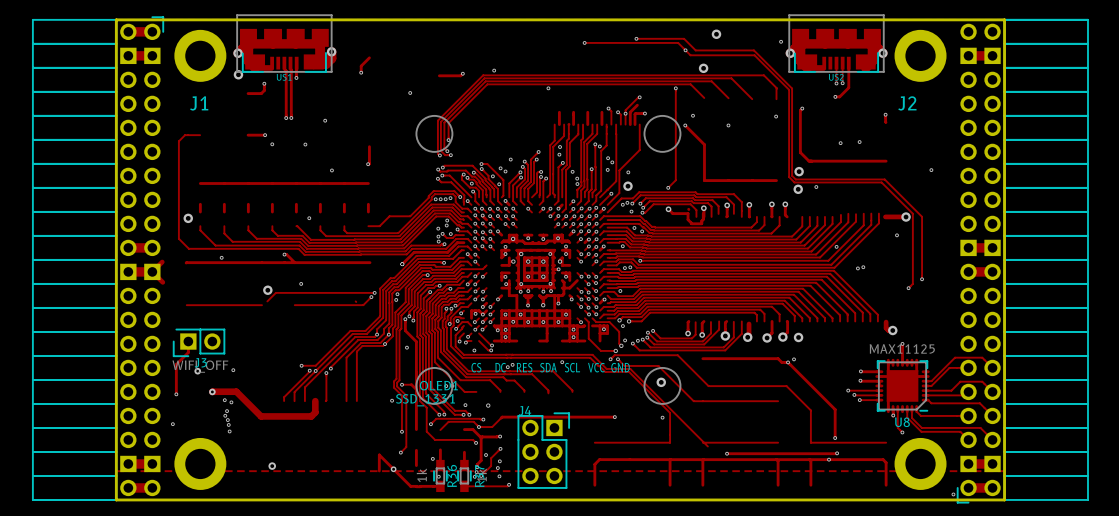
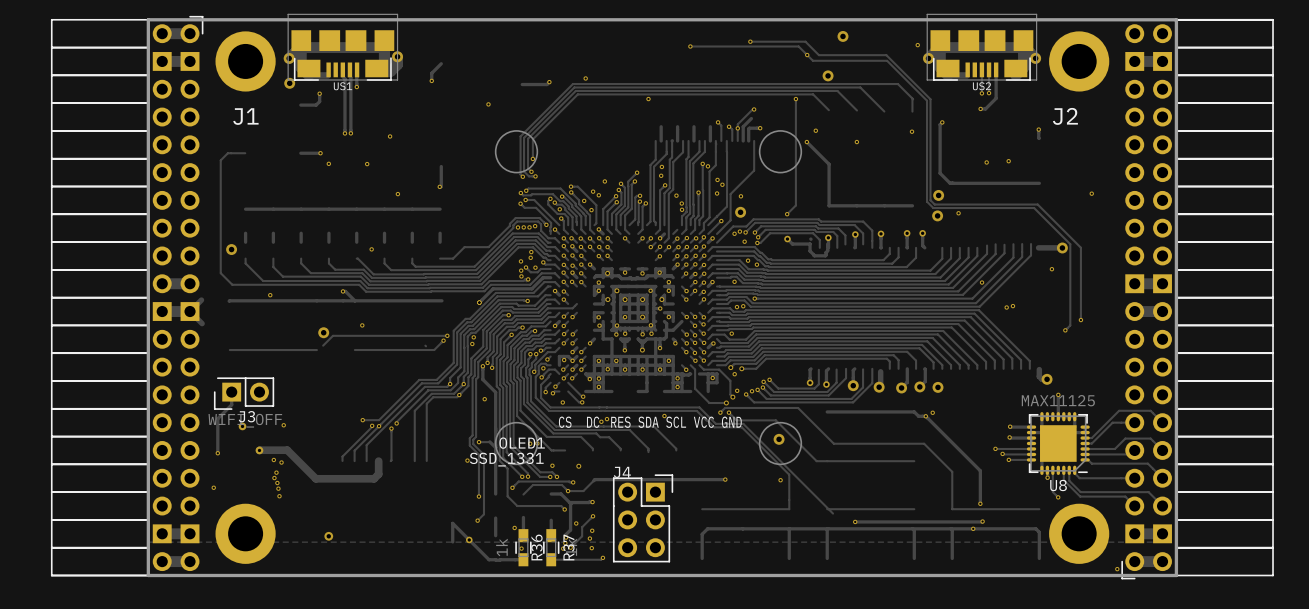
via: (573, 201) -> none
track: (565, 224) (562, 227) -> none
via: (565, 224) -> none

